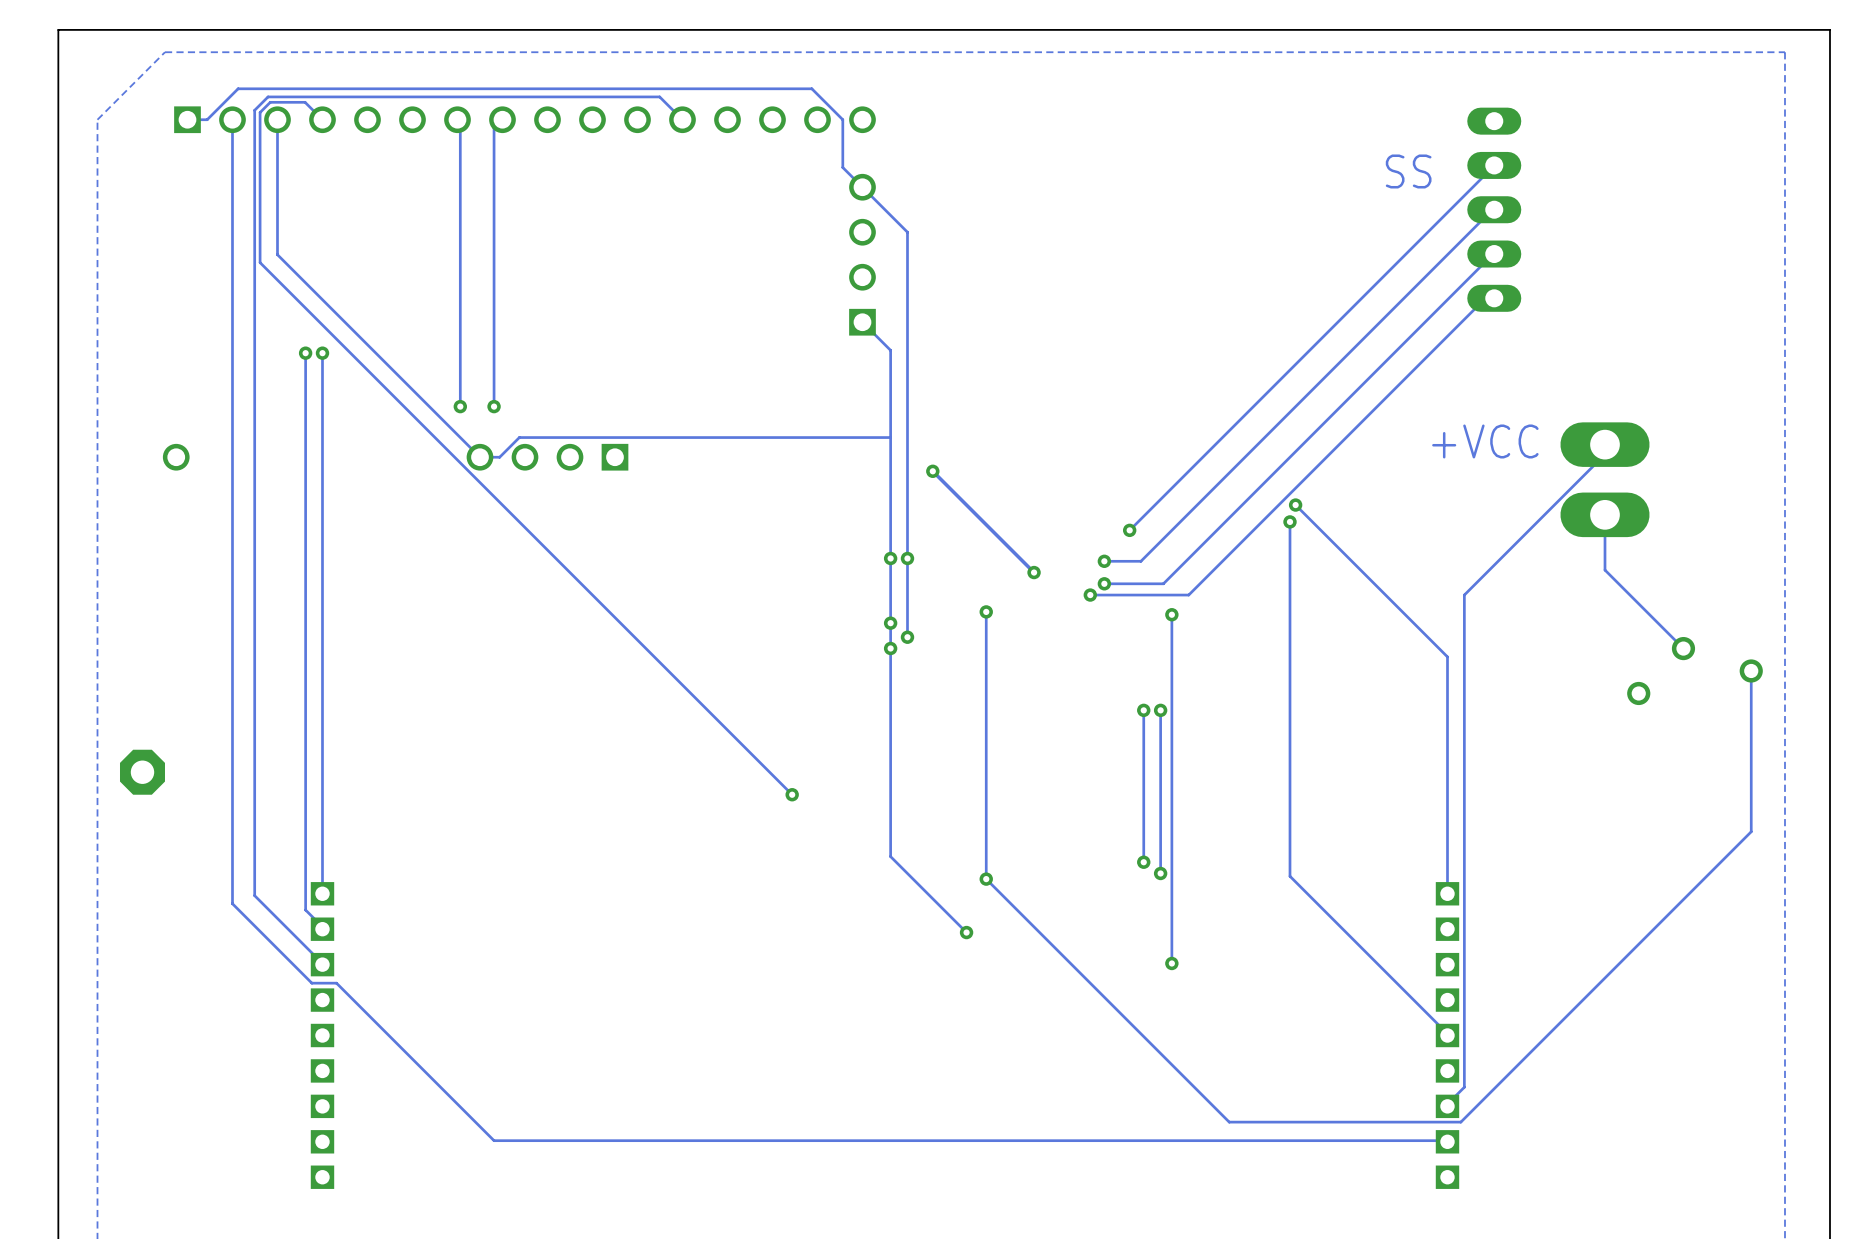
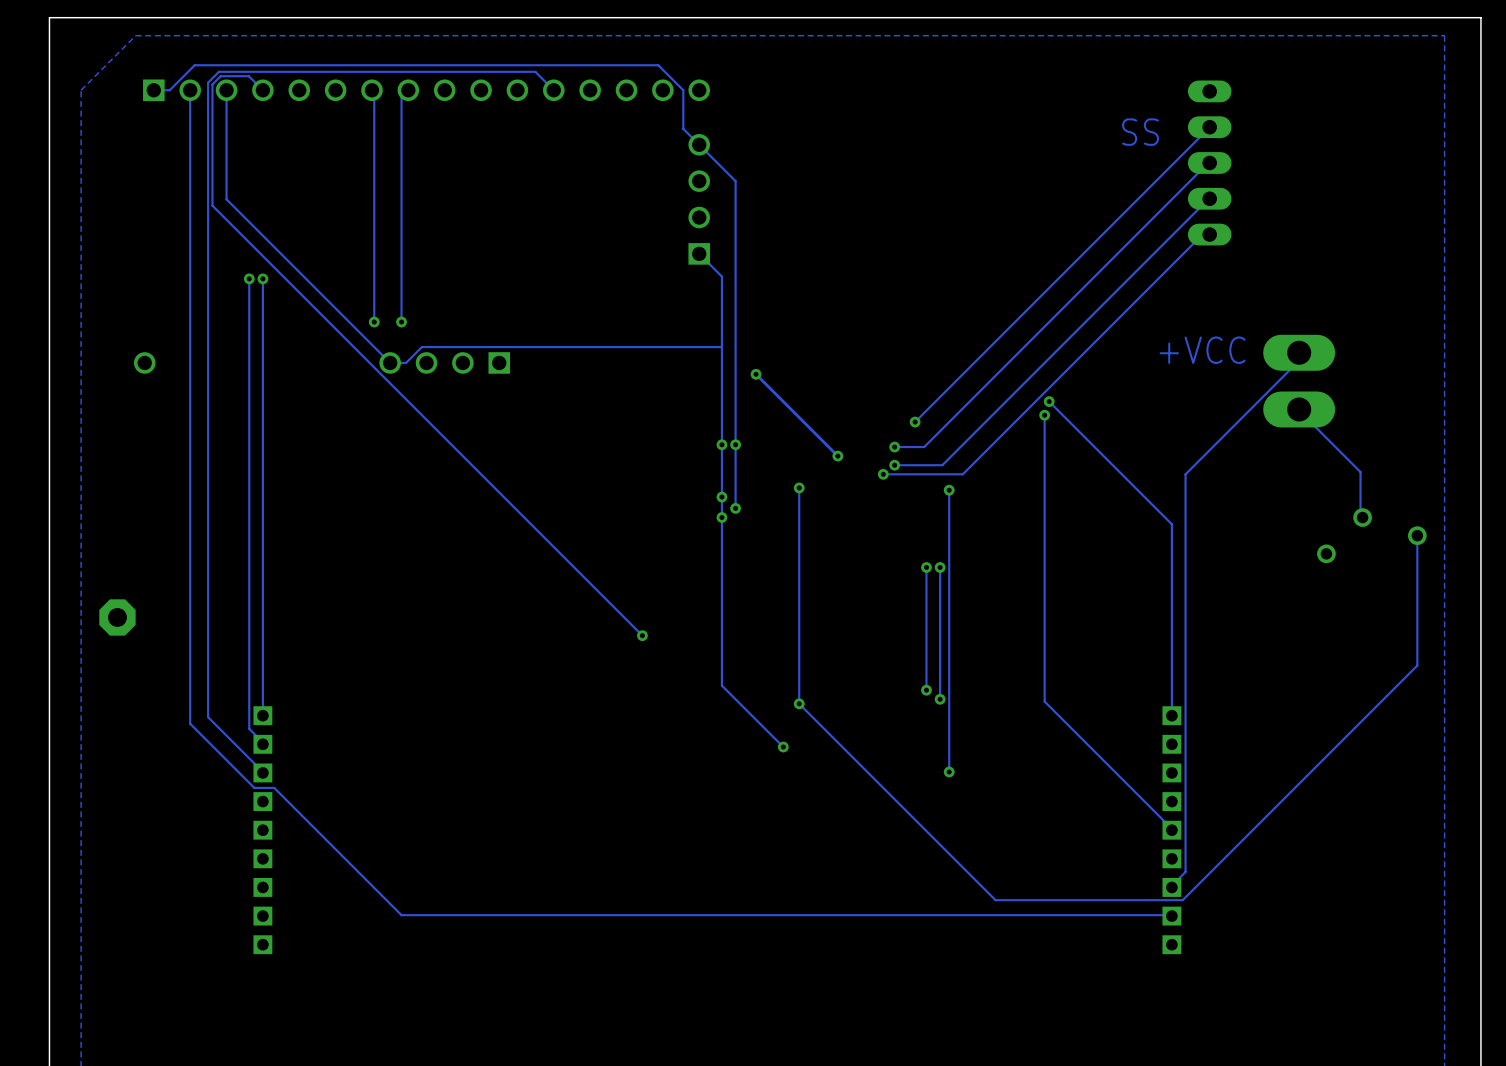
track: (1604, 516) (1604, 570) (1683, 648) -> (1299, 410) (1360, 472) (1360, 517) (1362, 517)

